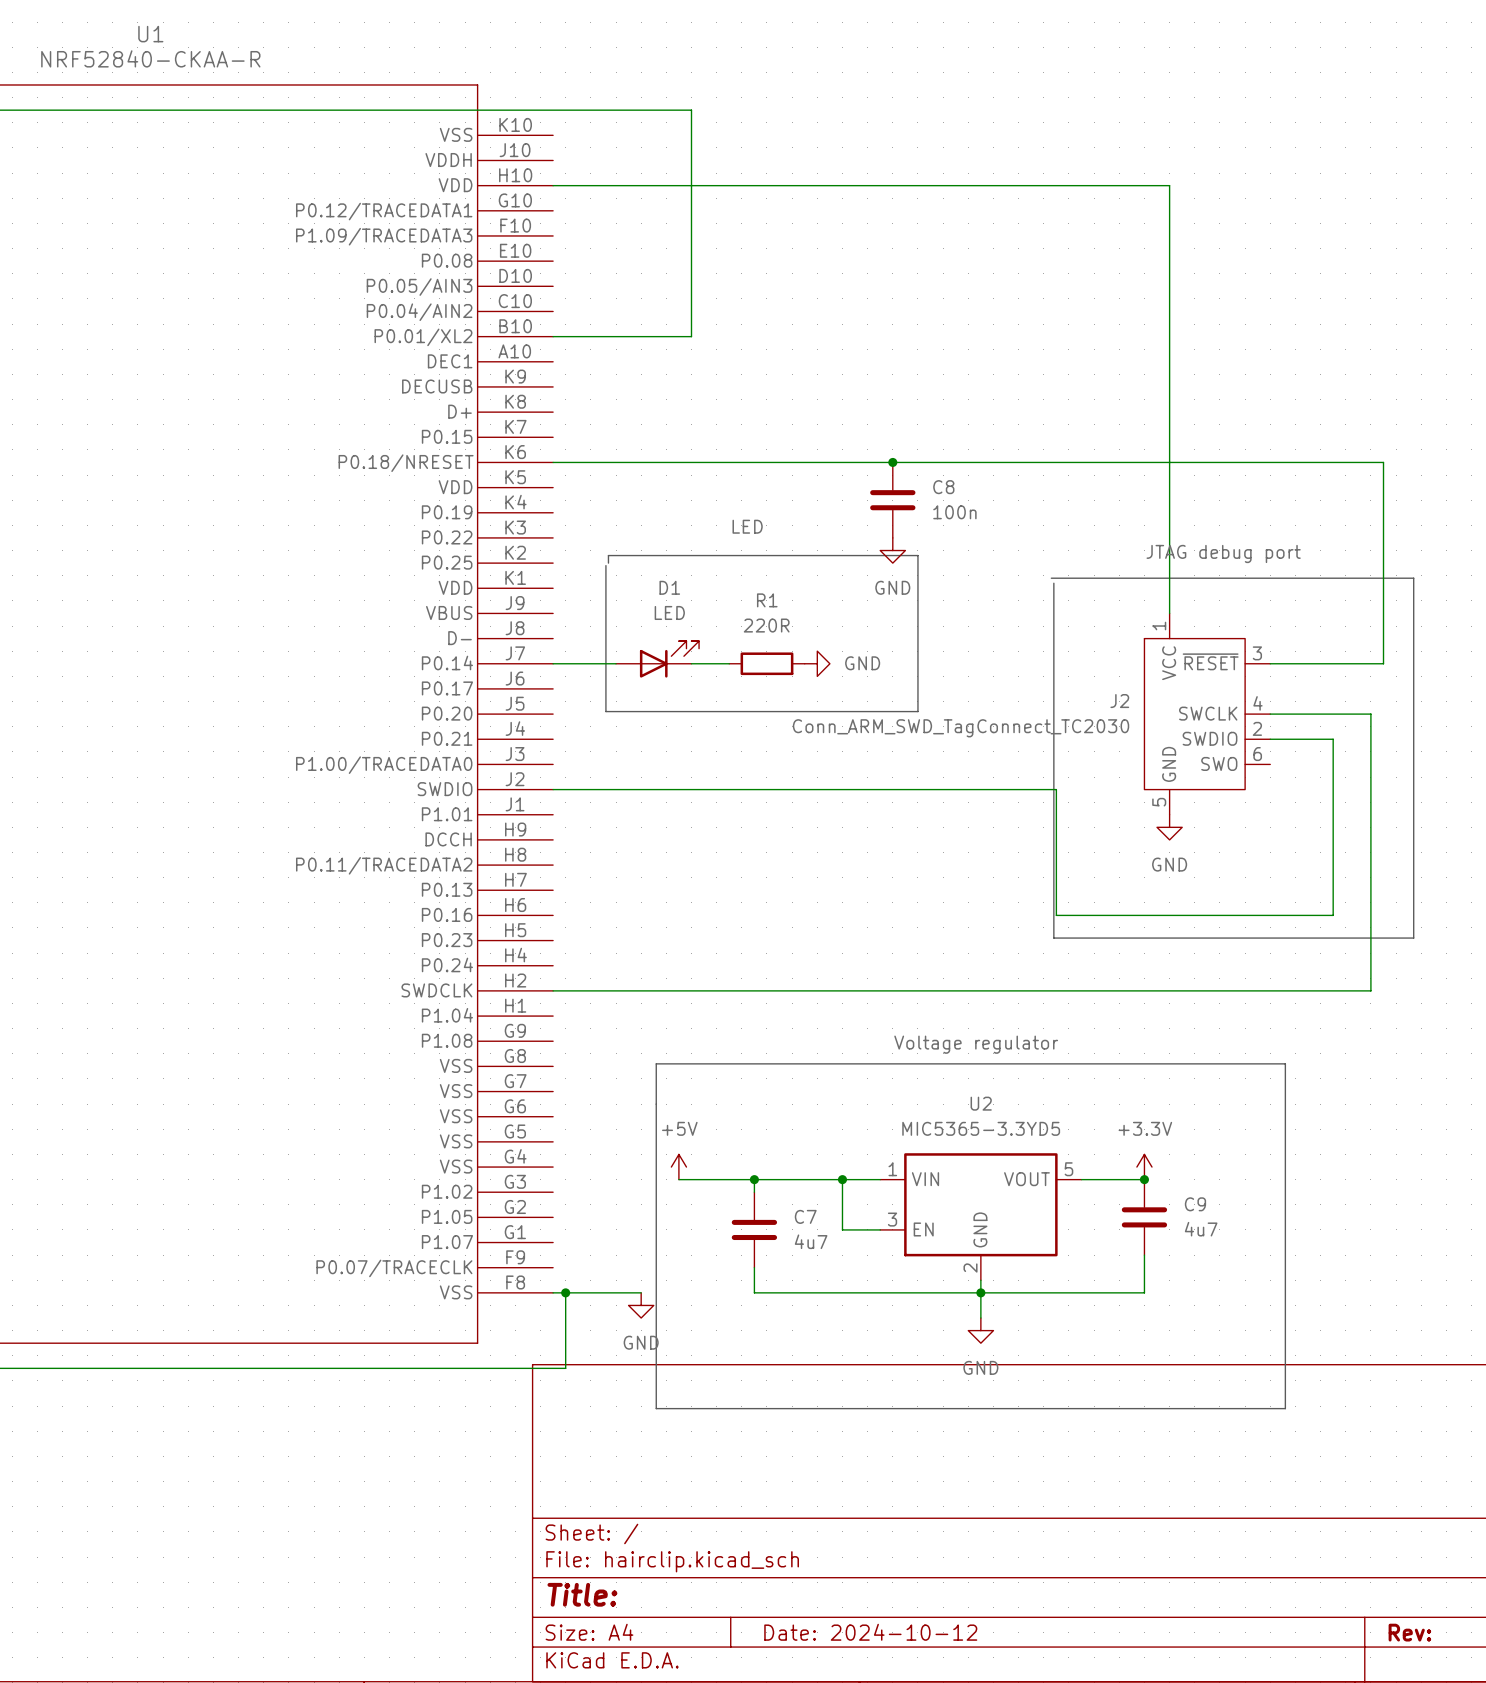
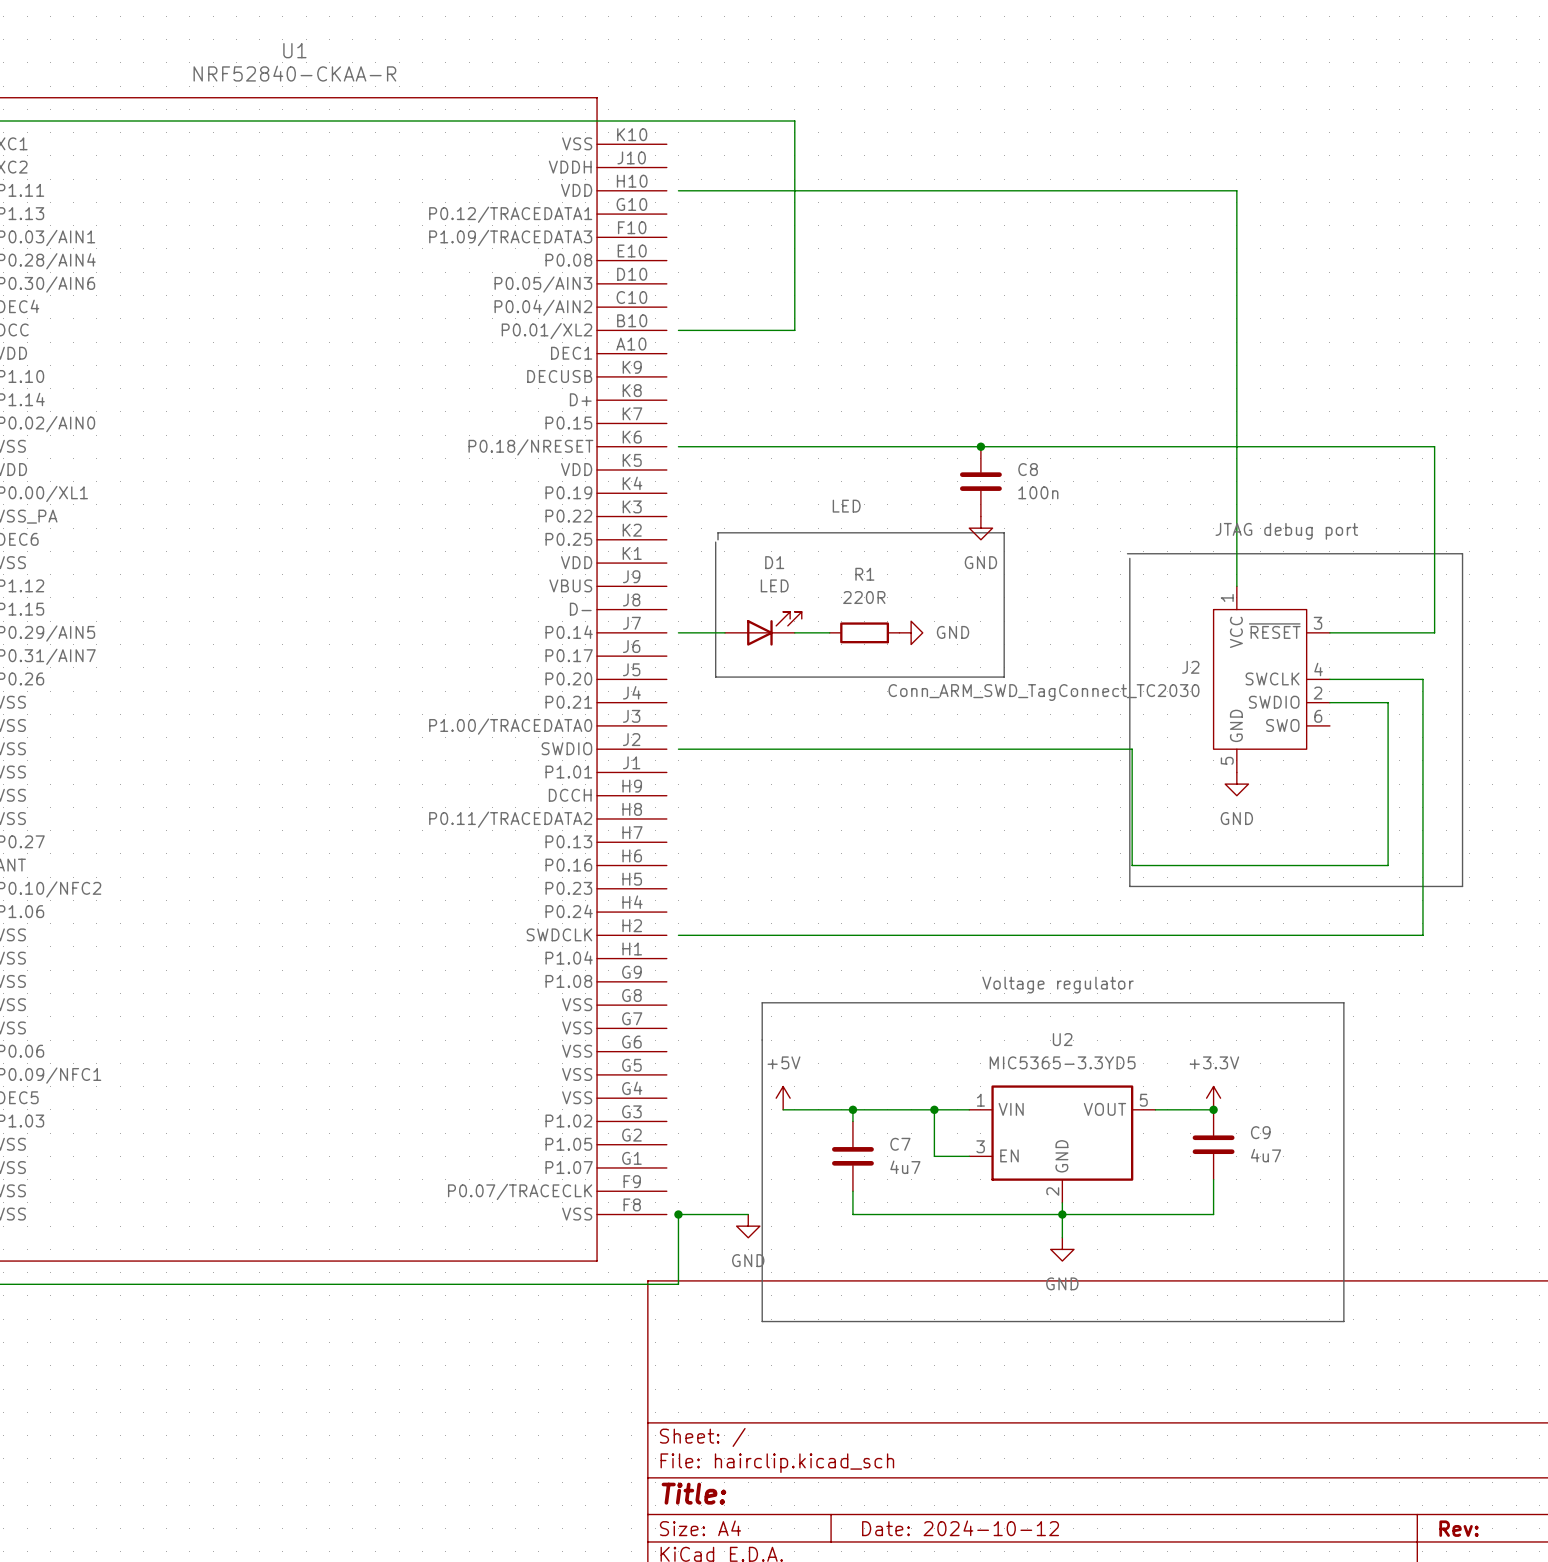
wire: (553, 185) (565, 185) -> none
wire: (553, 336) (565, 336) -> none
wire: (553, 462) (565, 462) -> none
wire: (553, 663) (565, 663) -> none
wire: (553, 789) (565, 789) -> none
wire: (553, 990) (565, 990) -> none
wire: (553, 1292) (565, 1292) -> none

